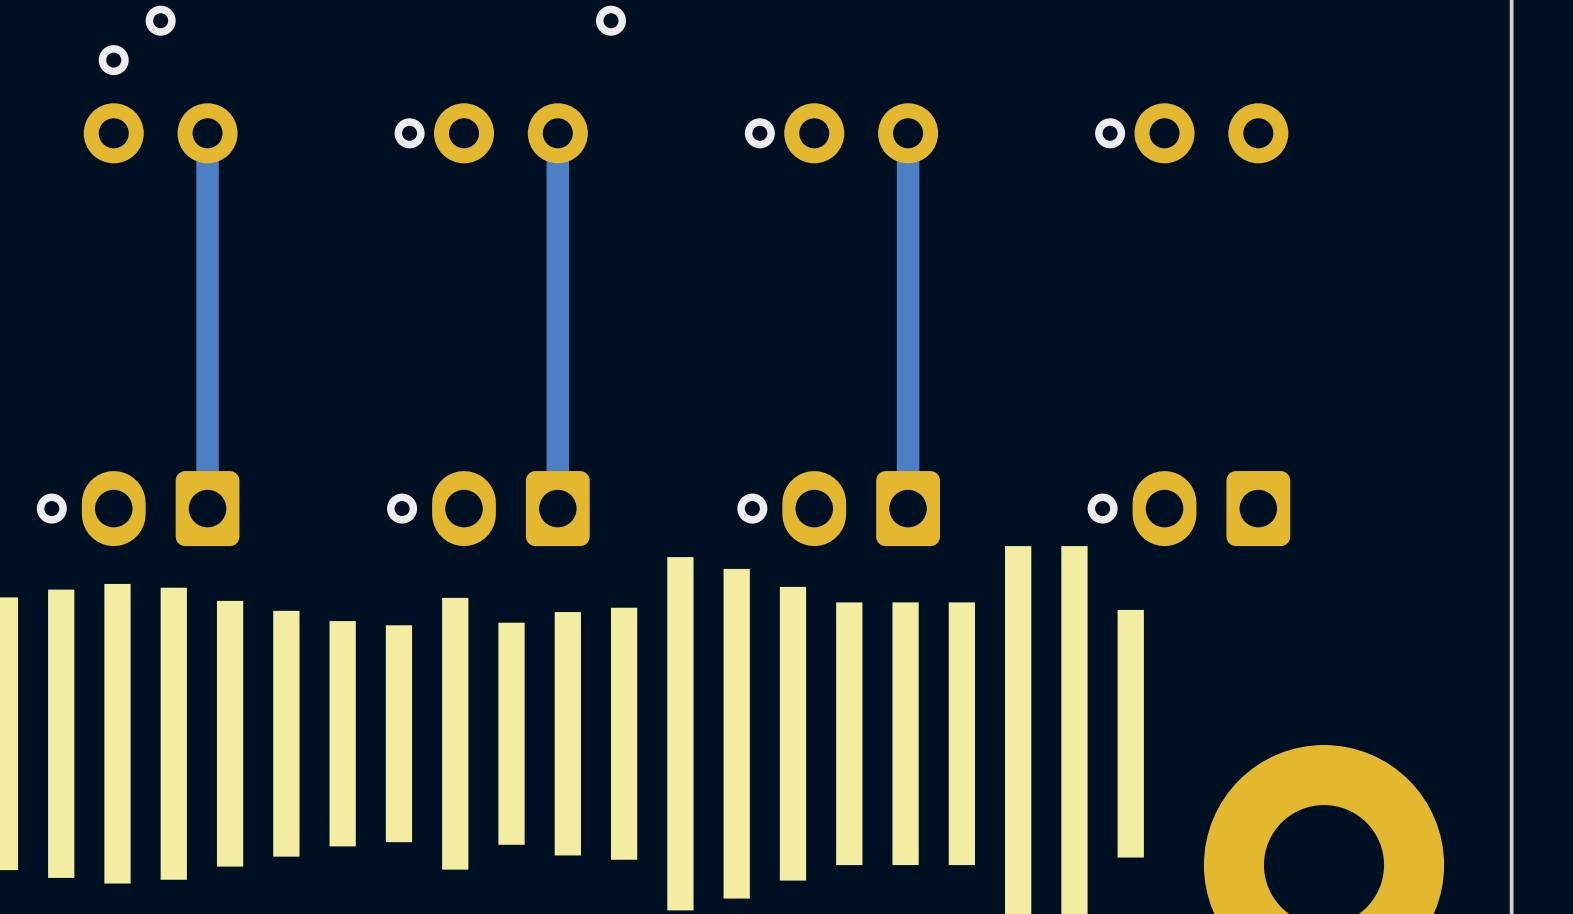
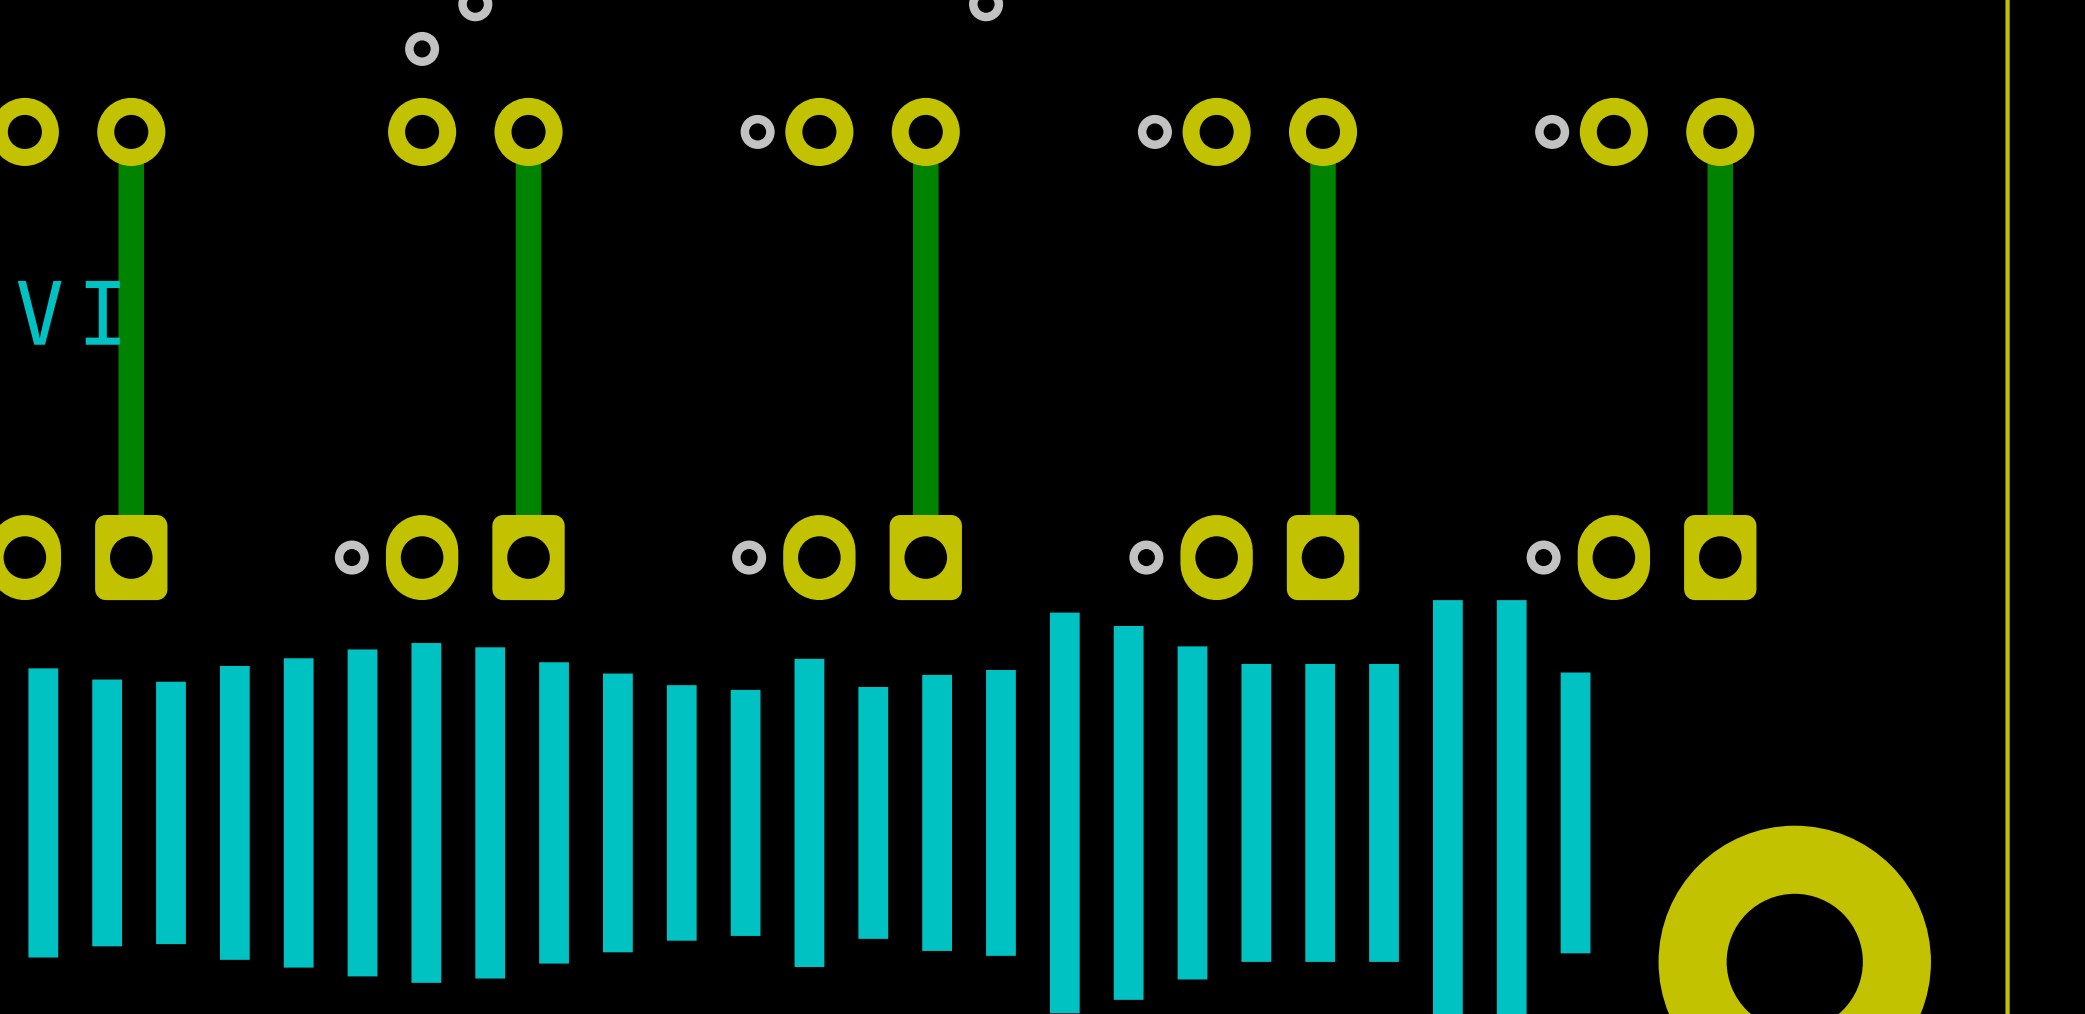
track: none -> (1720, 131) (1720, 557)

